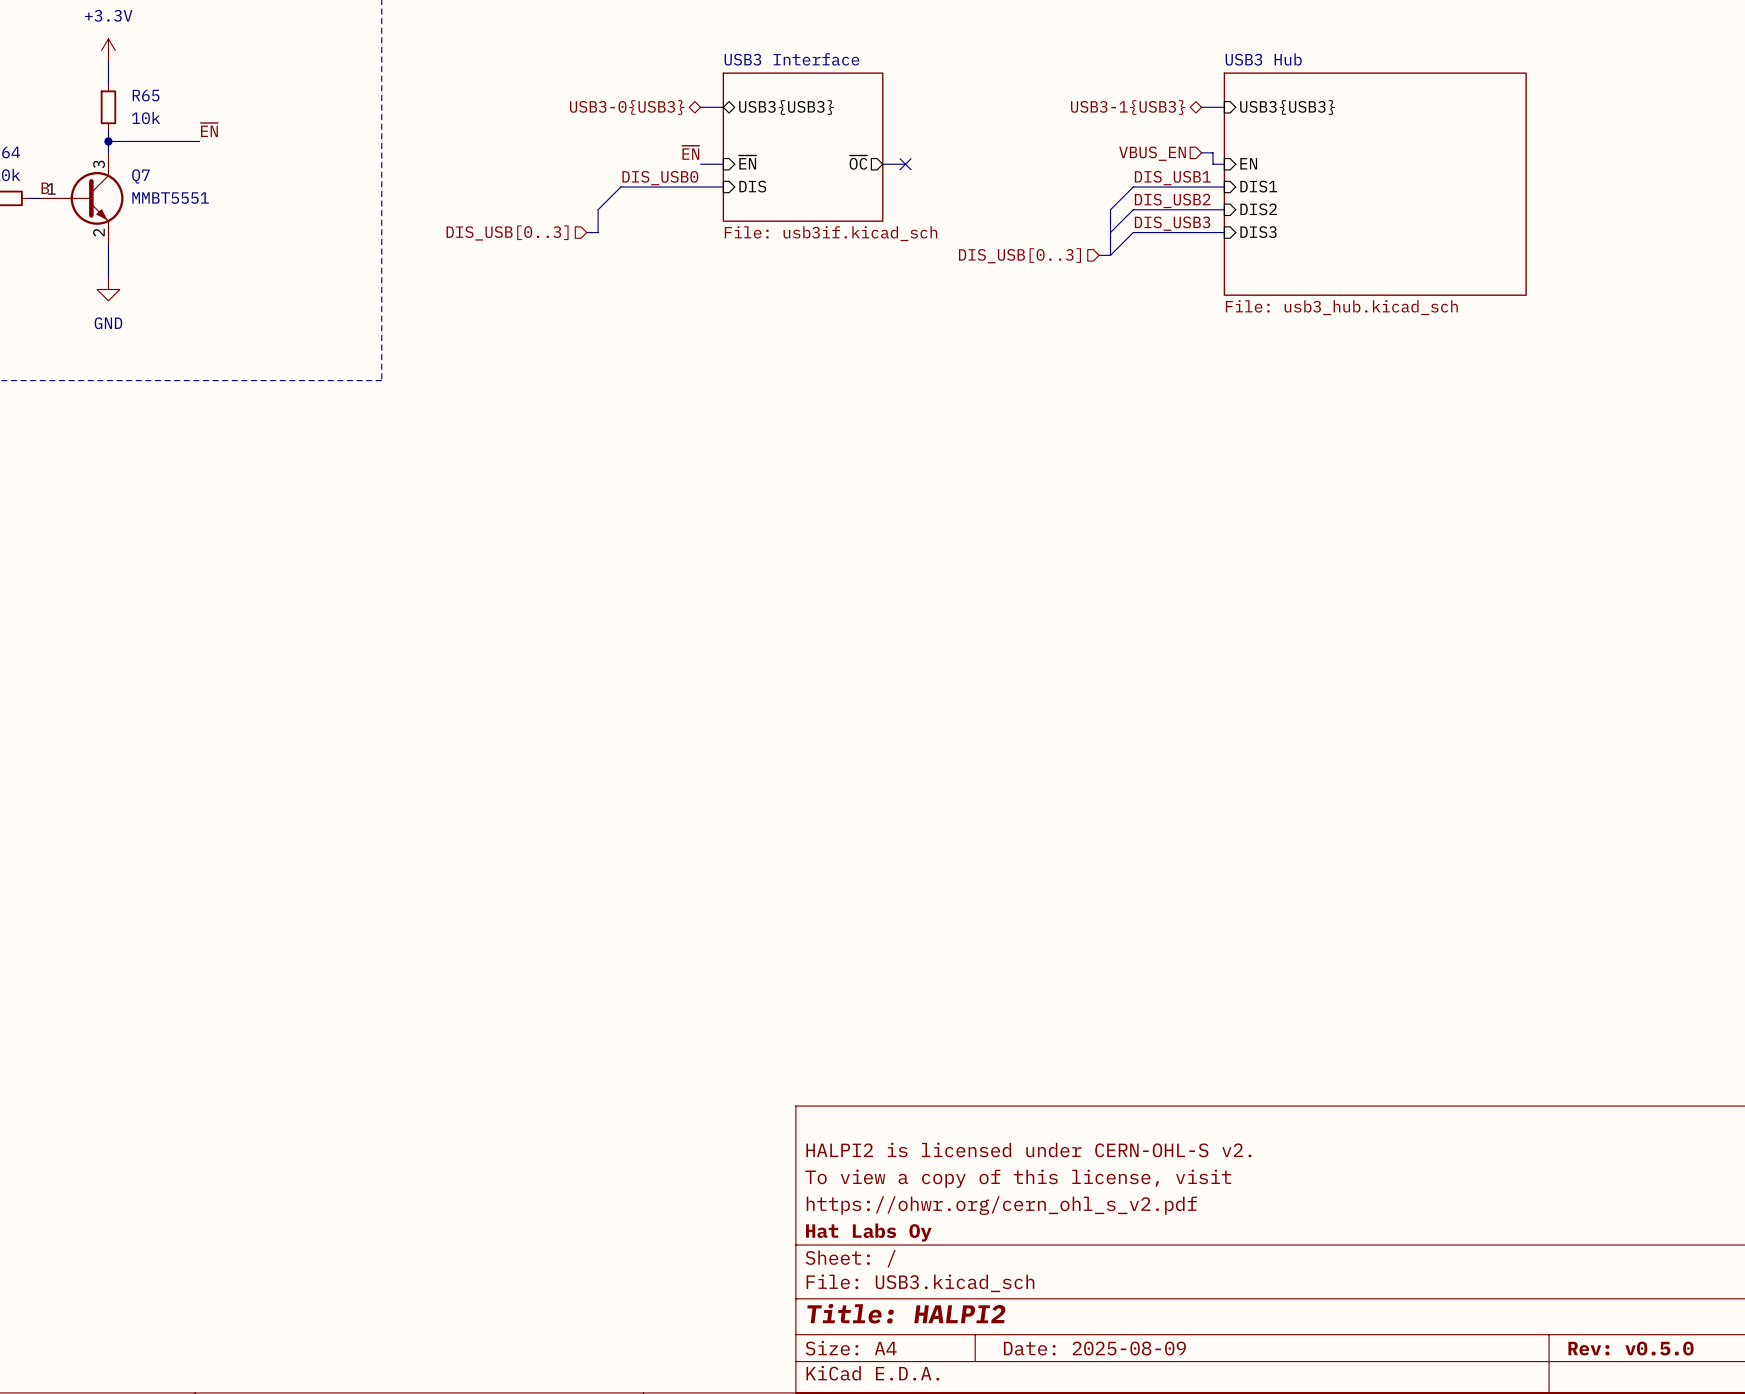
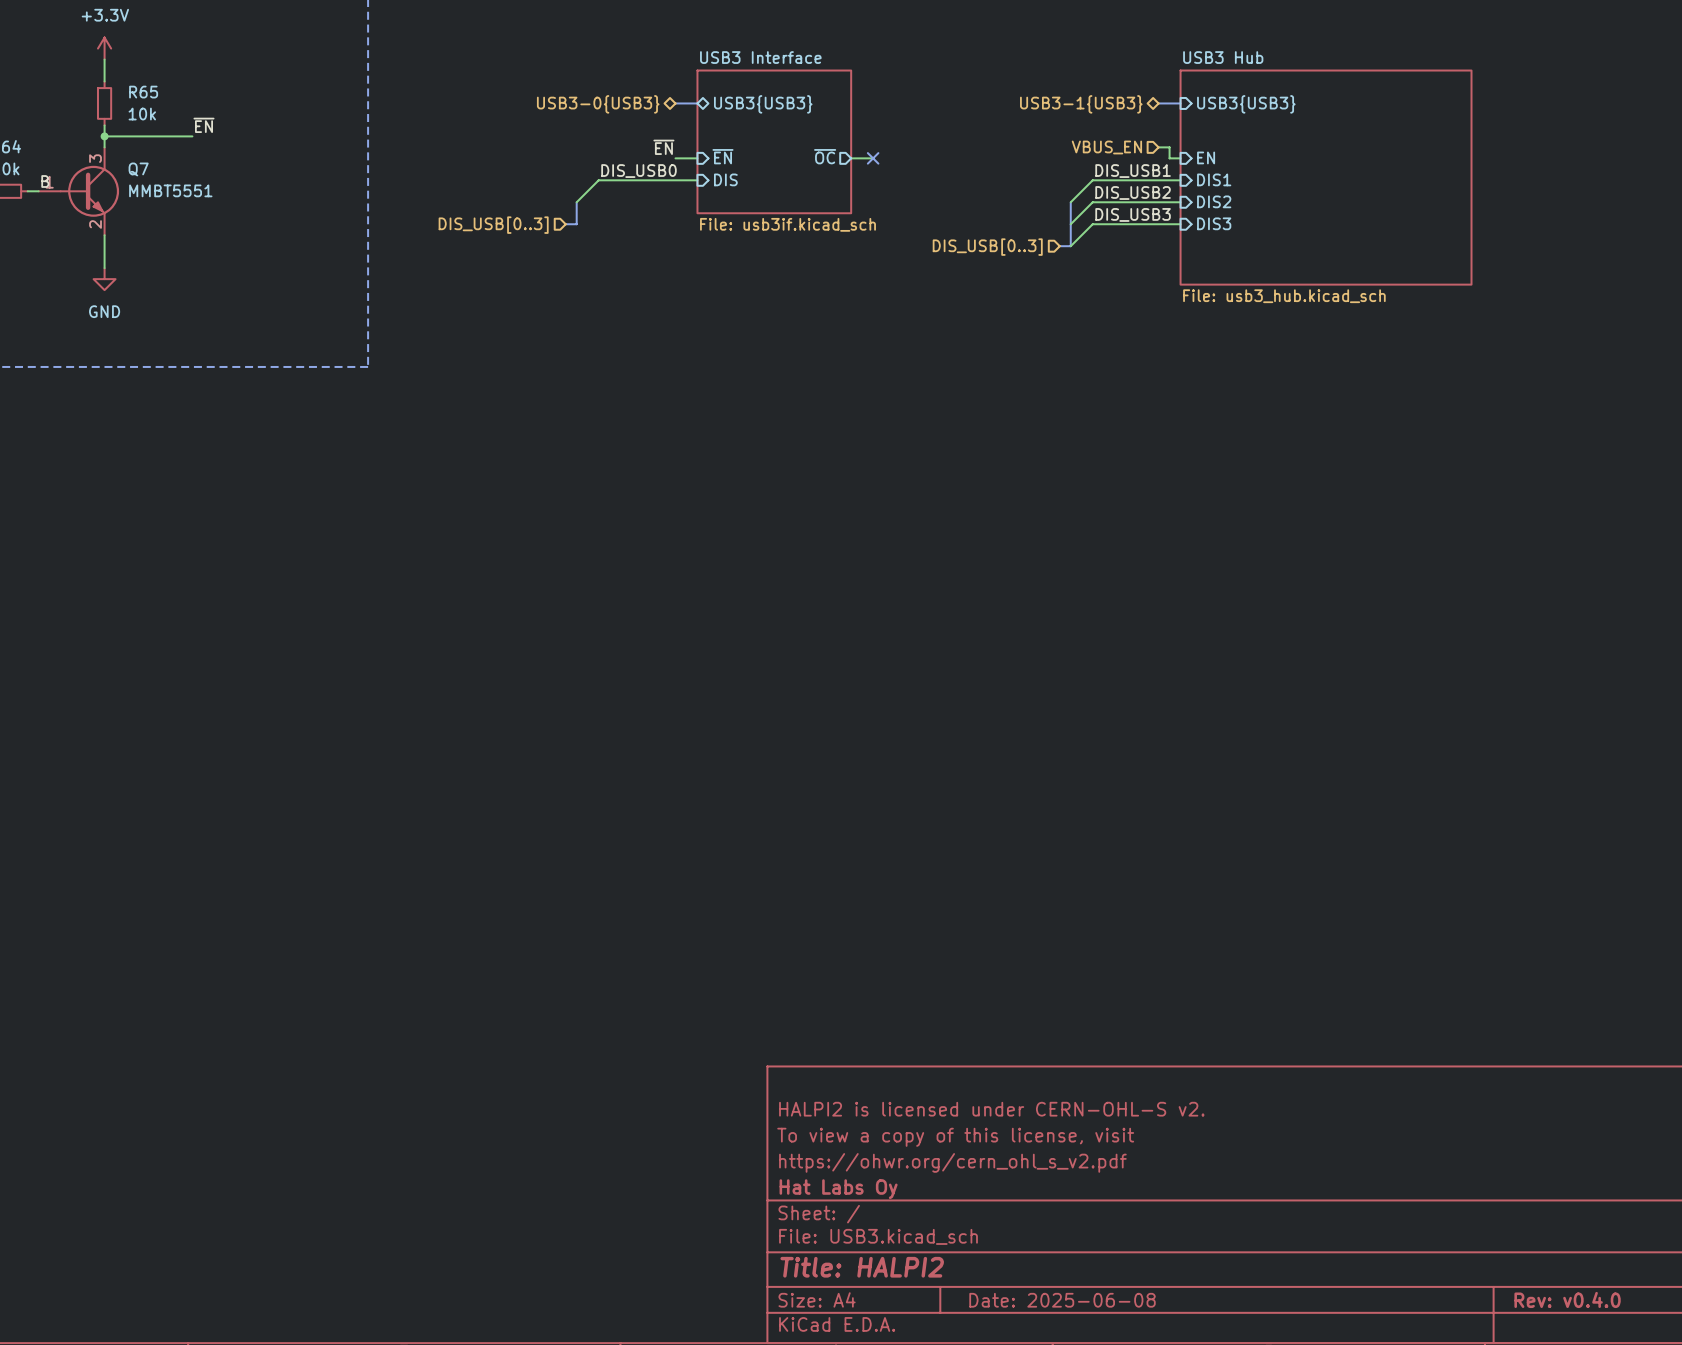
title block: Date: 2025-08-09 (1094, 1348) -> Date: 2025-06-08 (1062, 1300)
title block: Rev: v0.5.0 (1631, 1348) -> Rev: v0.4.0 (1567, 1299)

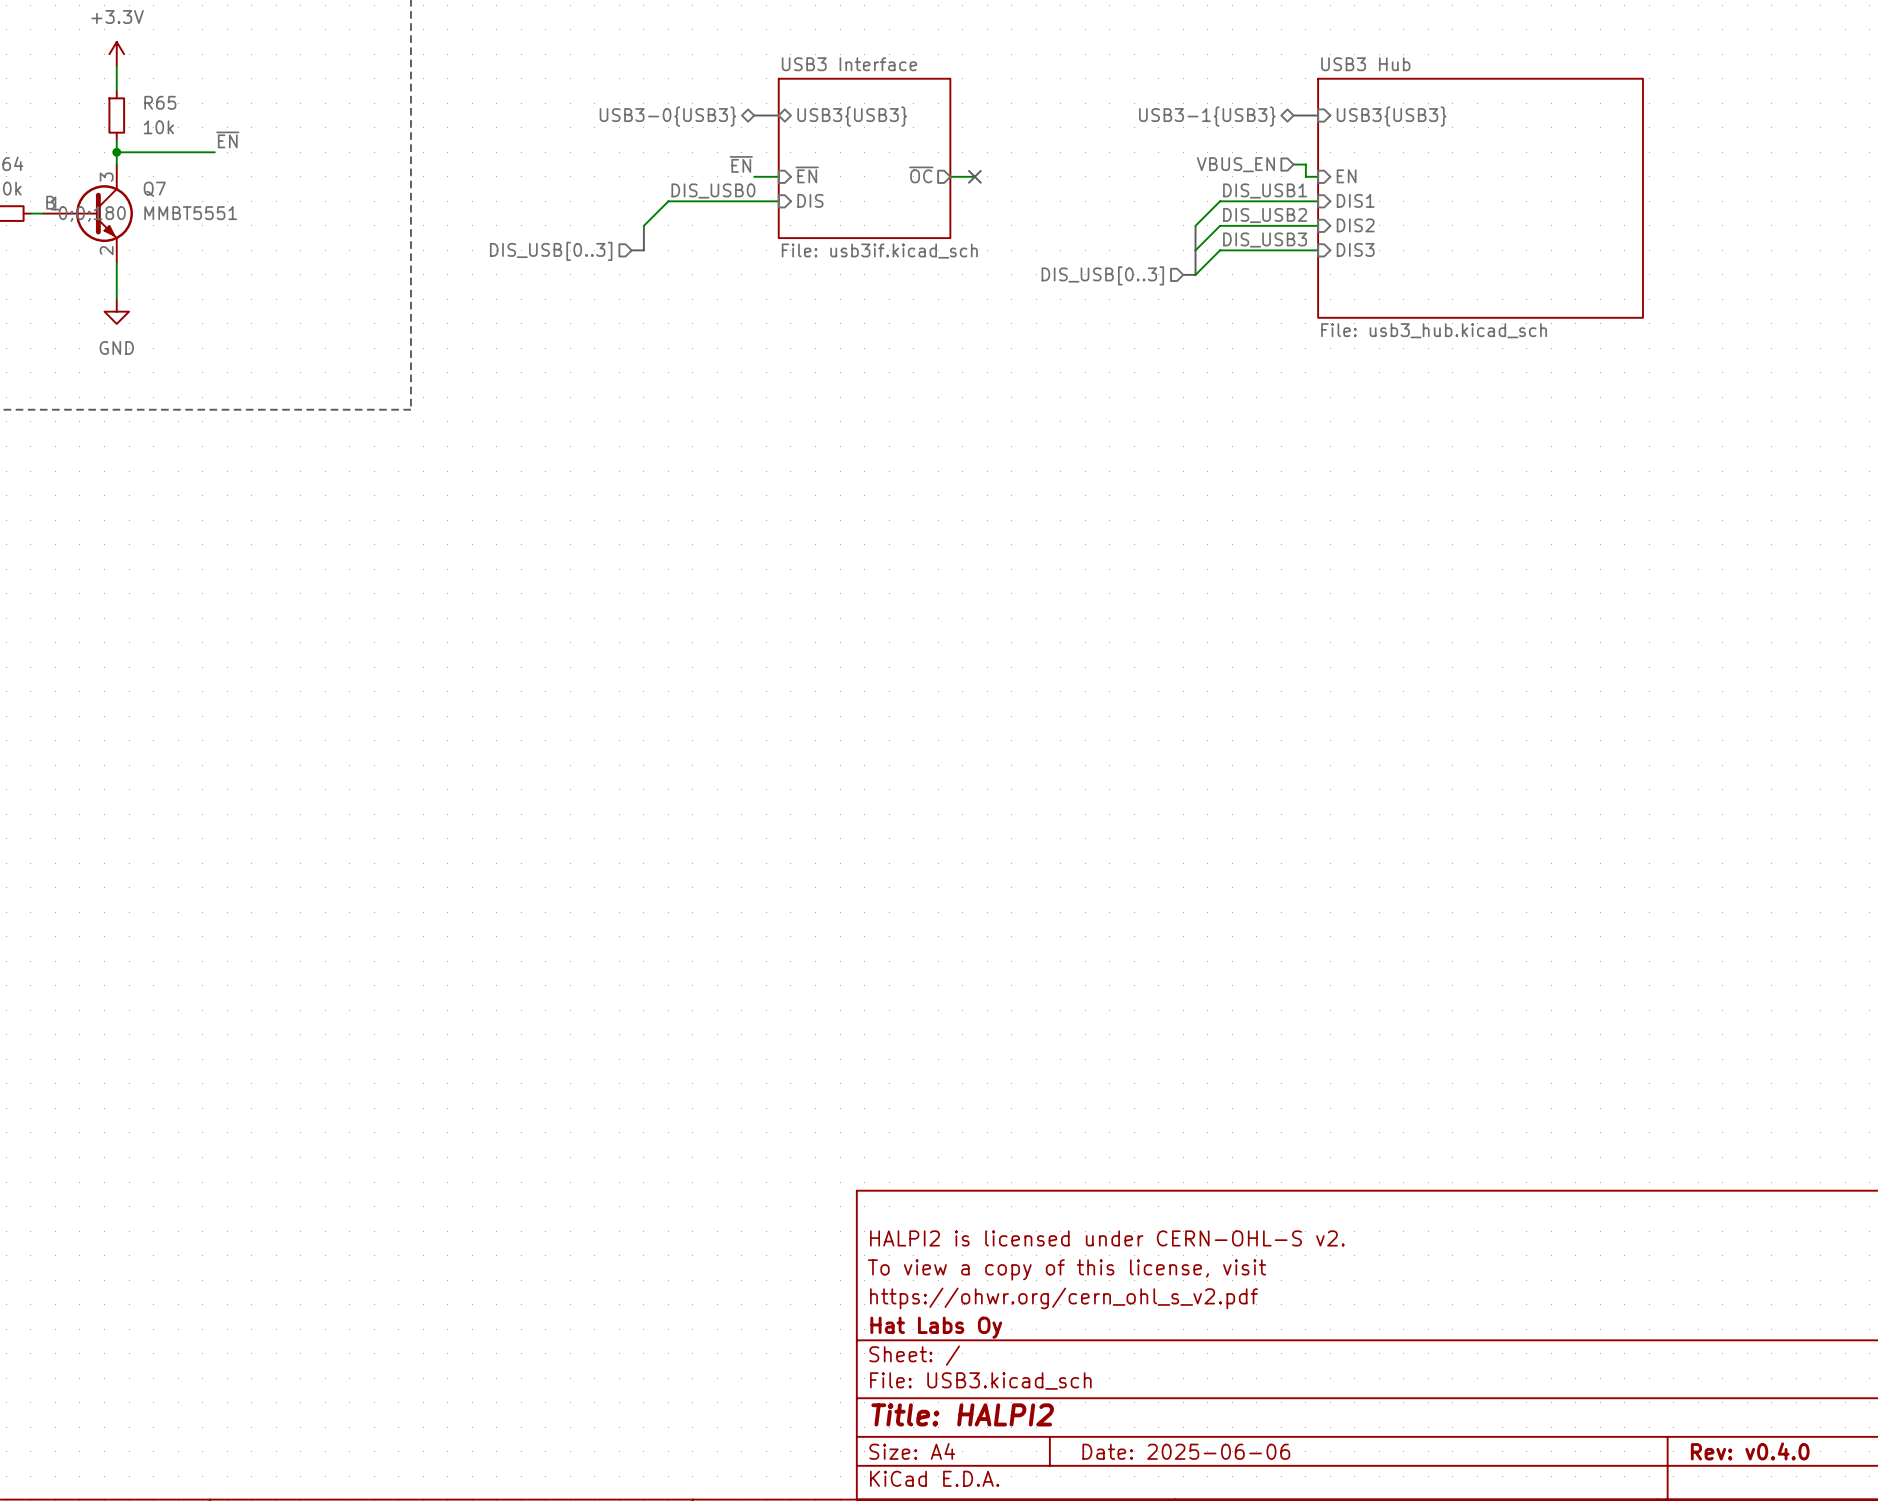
Q7 text: none -> 0;0;180 (92, 214)
title block: Date: 2025-06-08 (1062, 1300) -> Date: 2025-06-06 (1186, 1451)

